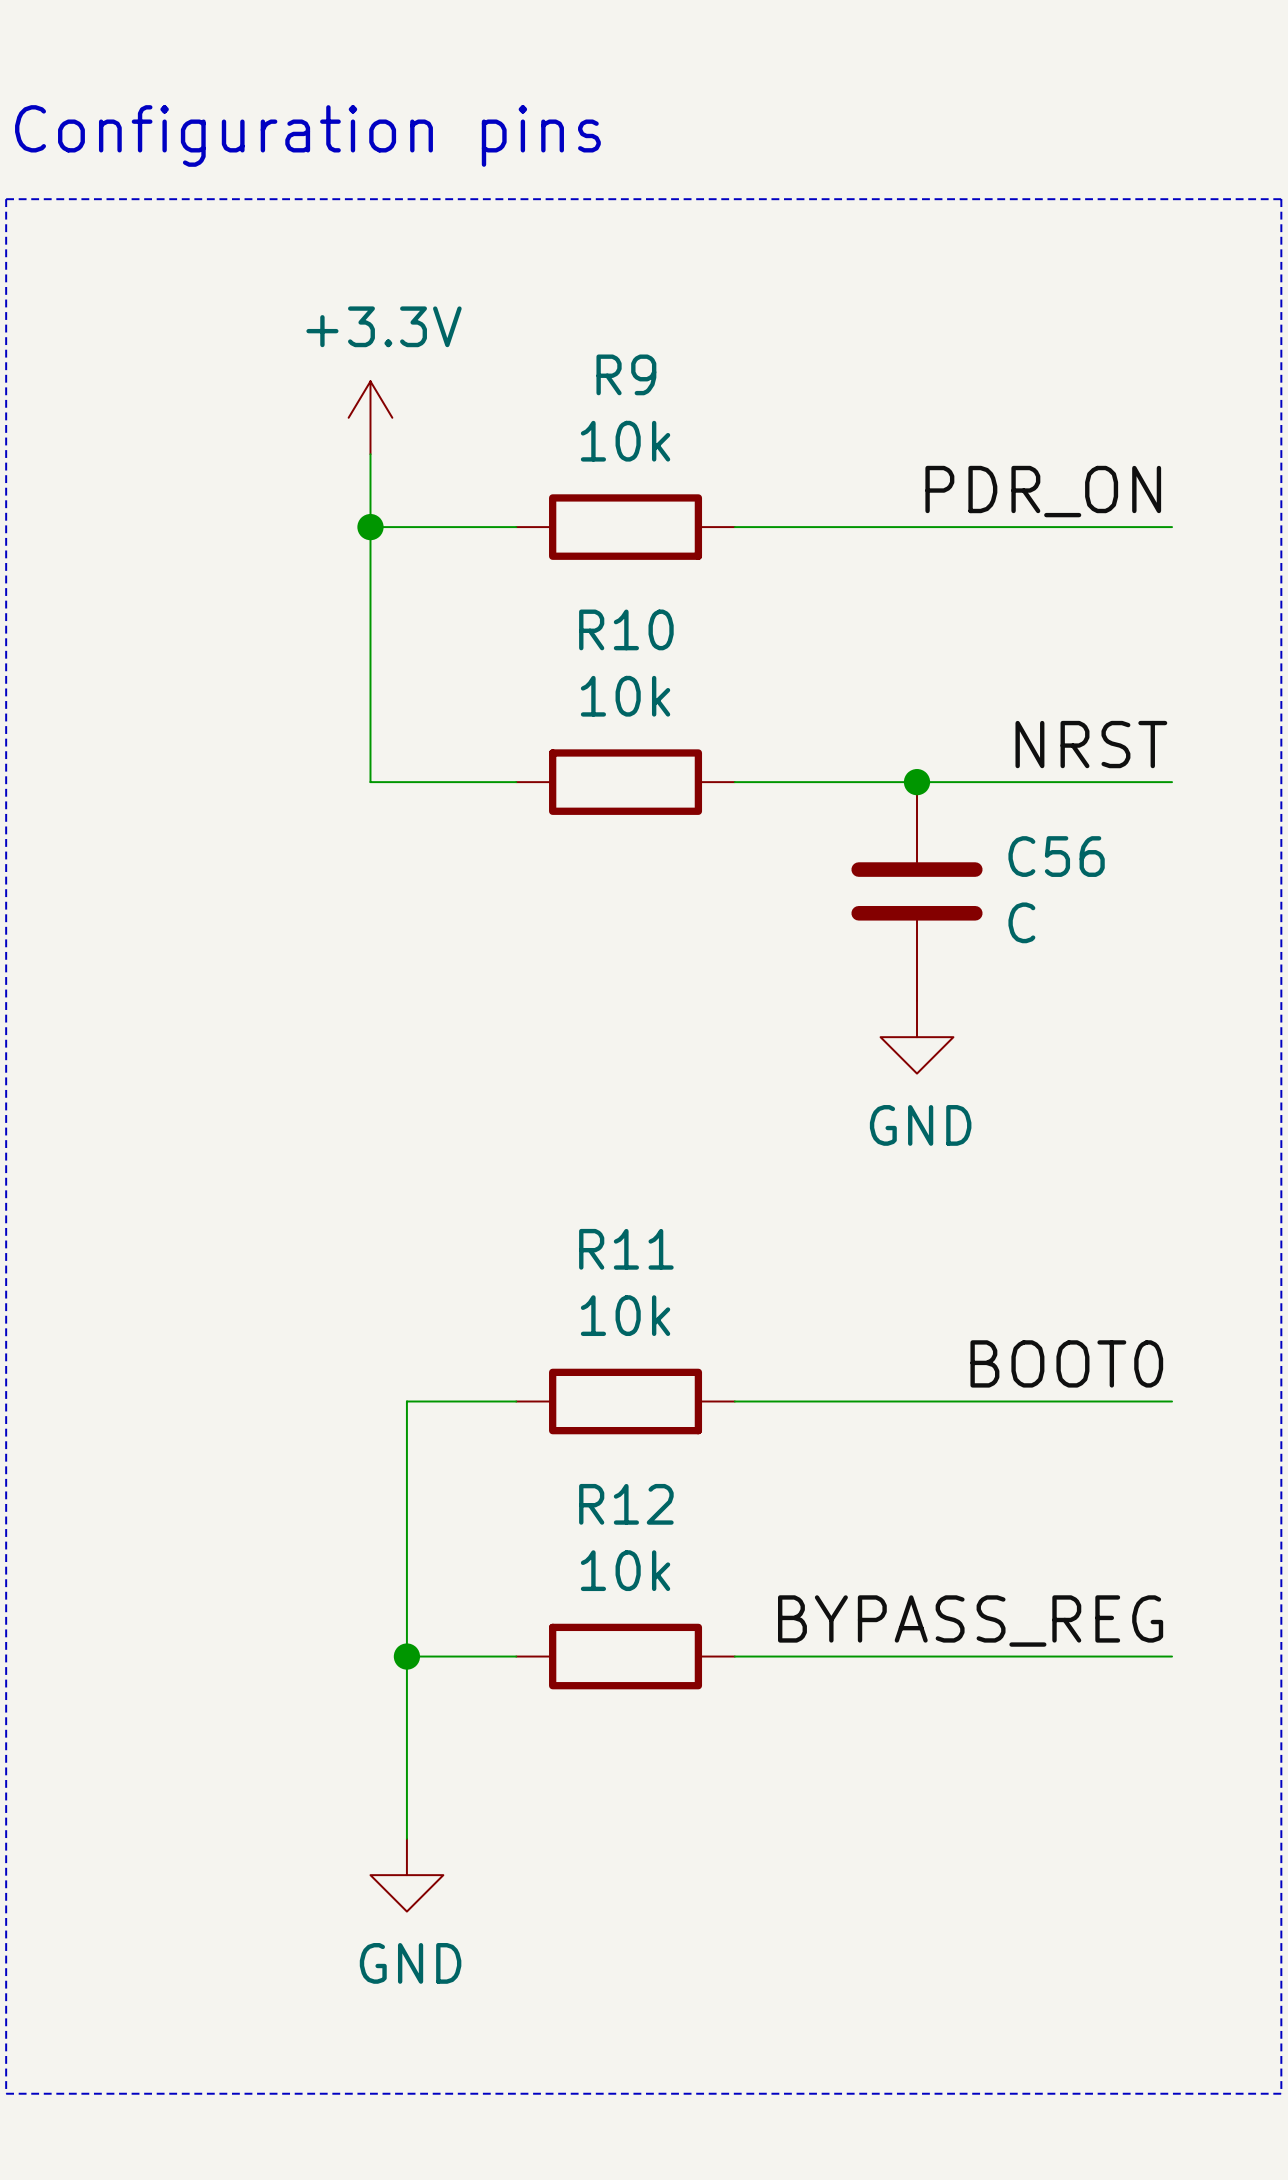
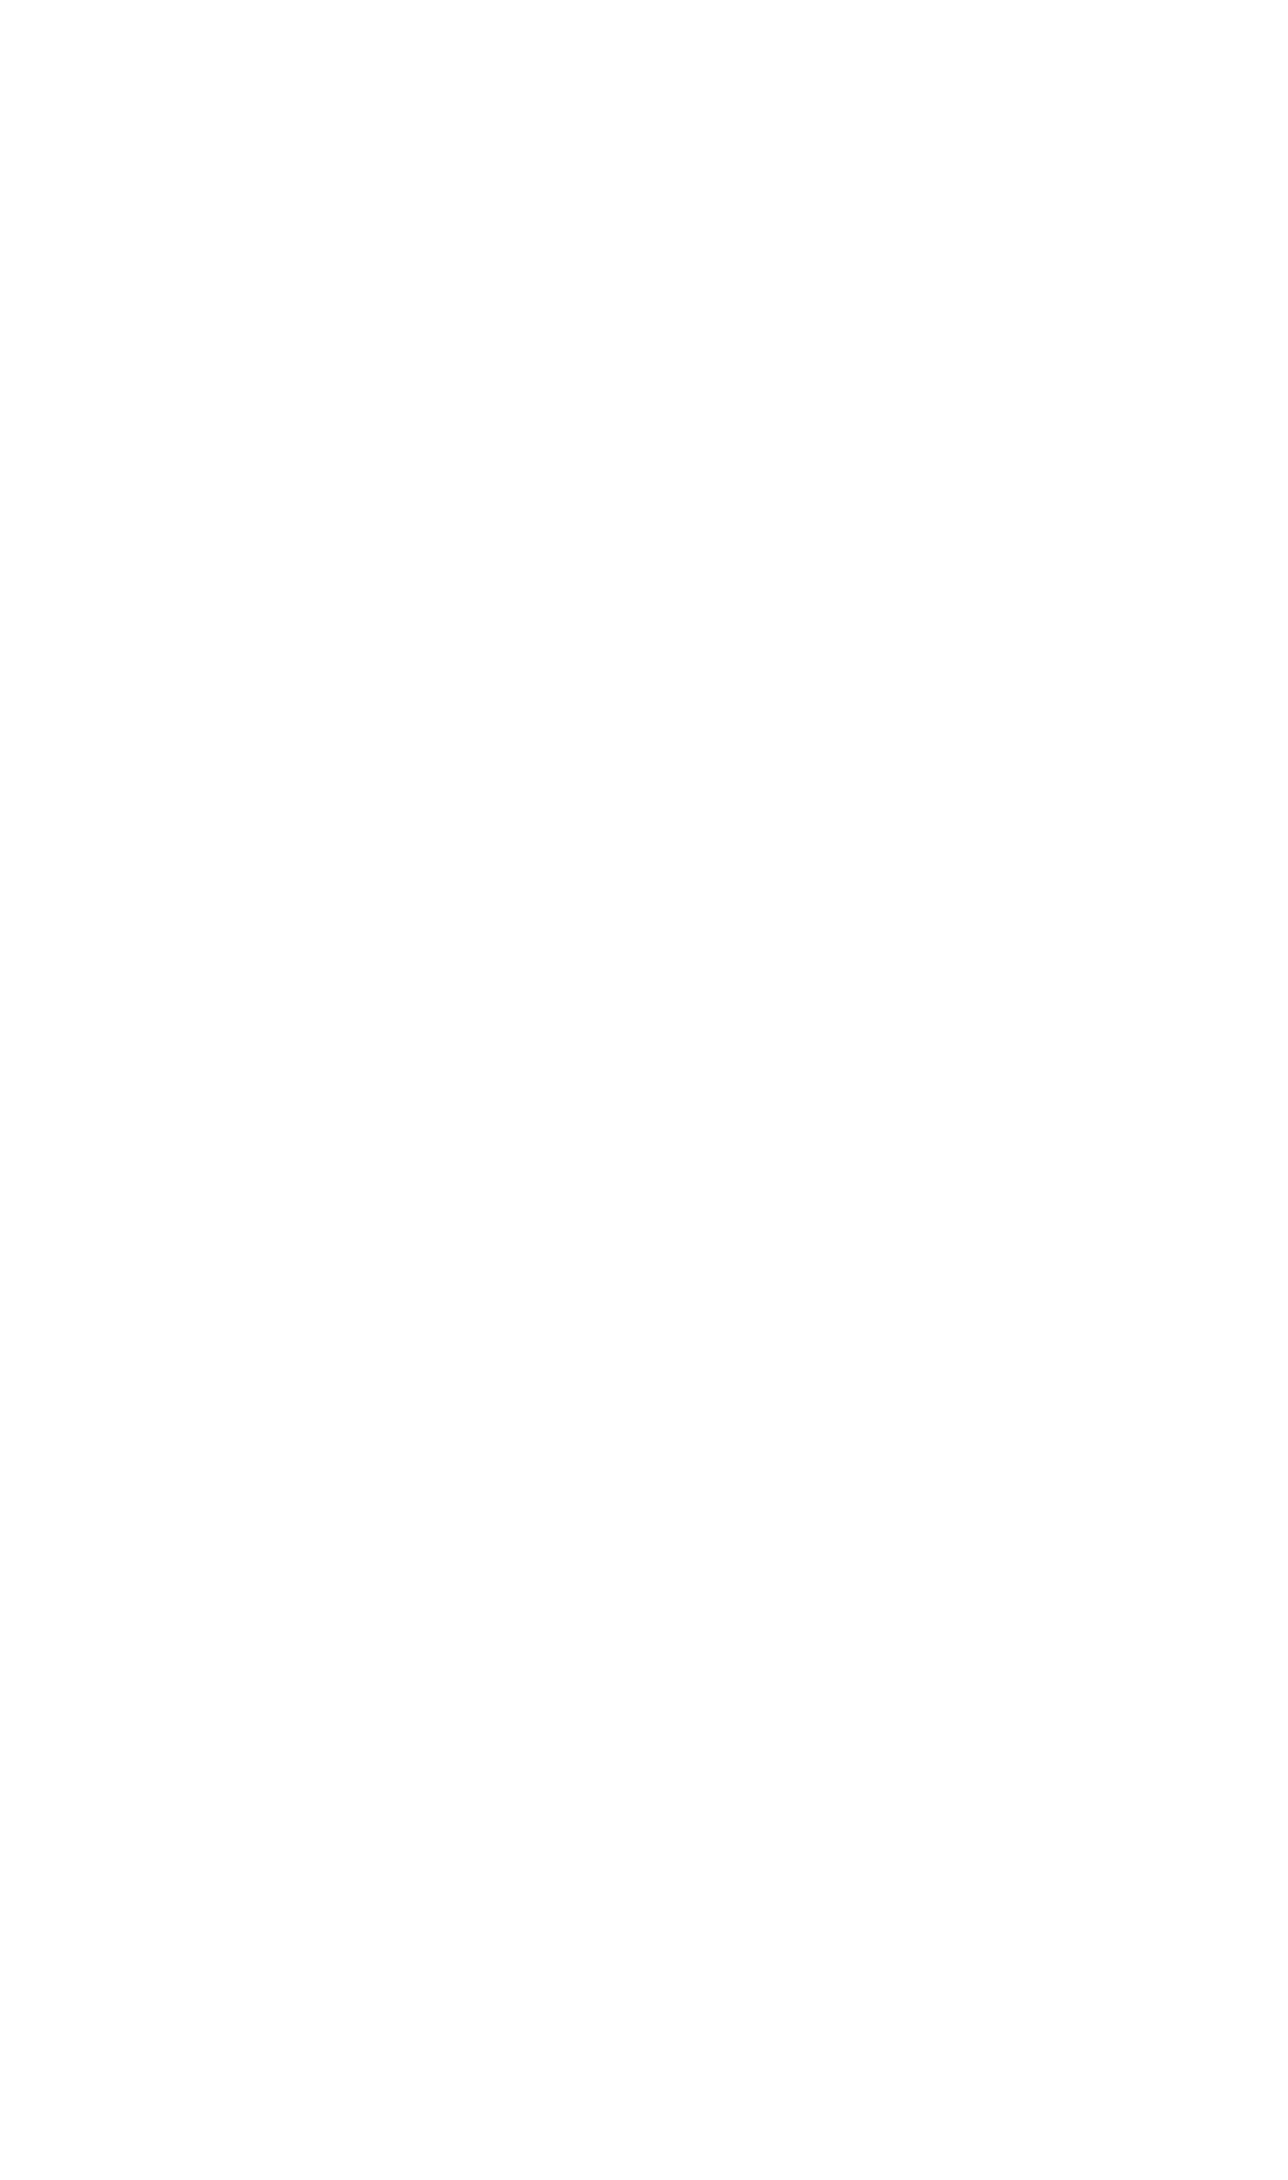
text: Configuration pins (307, 135) -> none
line: (6, 199) (1281, 199) (1281, 2093) (6, 2093) (6, 199) -> none
power symbol: +3.3V (370, 417) -> none
wire: (370, 454) (370, 782) (516, 782) -> none
label: PDR_ON (1043, 491) -> none
wire: (370, 527) (516, 527) -> none
junction: (370, 527) -> none
R9: 10k (625, 527) -> none
wire: (734, 527) (1172, 527) -> none
label: NRST (1091, 744) -> none
R10: 10k (625, 782) -> none
wire: (734, 782) (1172, 782) -> none
junction: (917, 782) -> none
C56: C (917, 891) -> none
power symbol: GND (917, 1037) -> none
label: BOOT0 (1066, 1363) -> none
wire: (516, 1401) (406, 1401) (406, 1838) -> none
R11: 10k (625, 1401) -> none
wire: (734, 1401) (1172, 1401) -> none
label: BYPASS_REG (970, 1621) -> none
wire: (406, 1656) (516, 1656) -> none
junction: (406, 1656) -> none
R12: 10k (625, 1656) -> none
wire: (734, 1656) (1172, 1656) -> none
power symbol: GND (406, 1875) -> none

